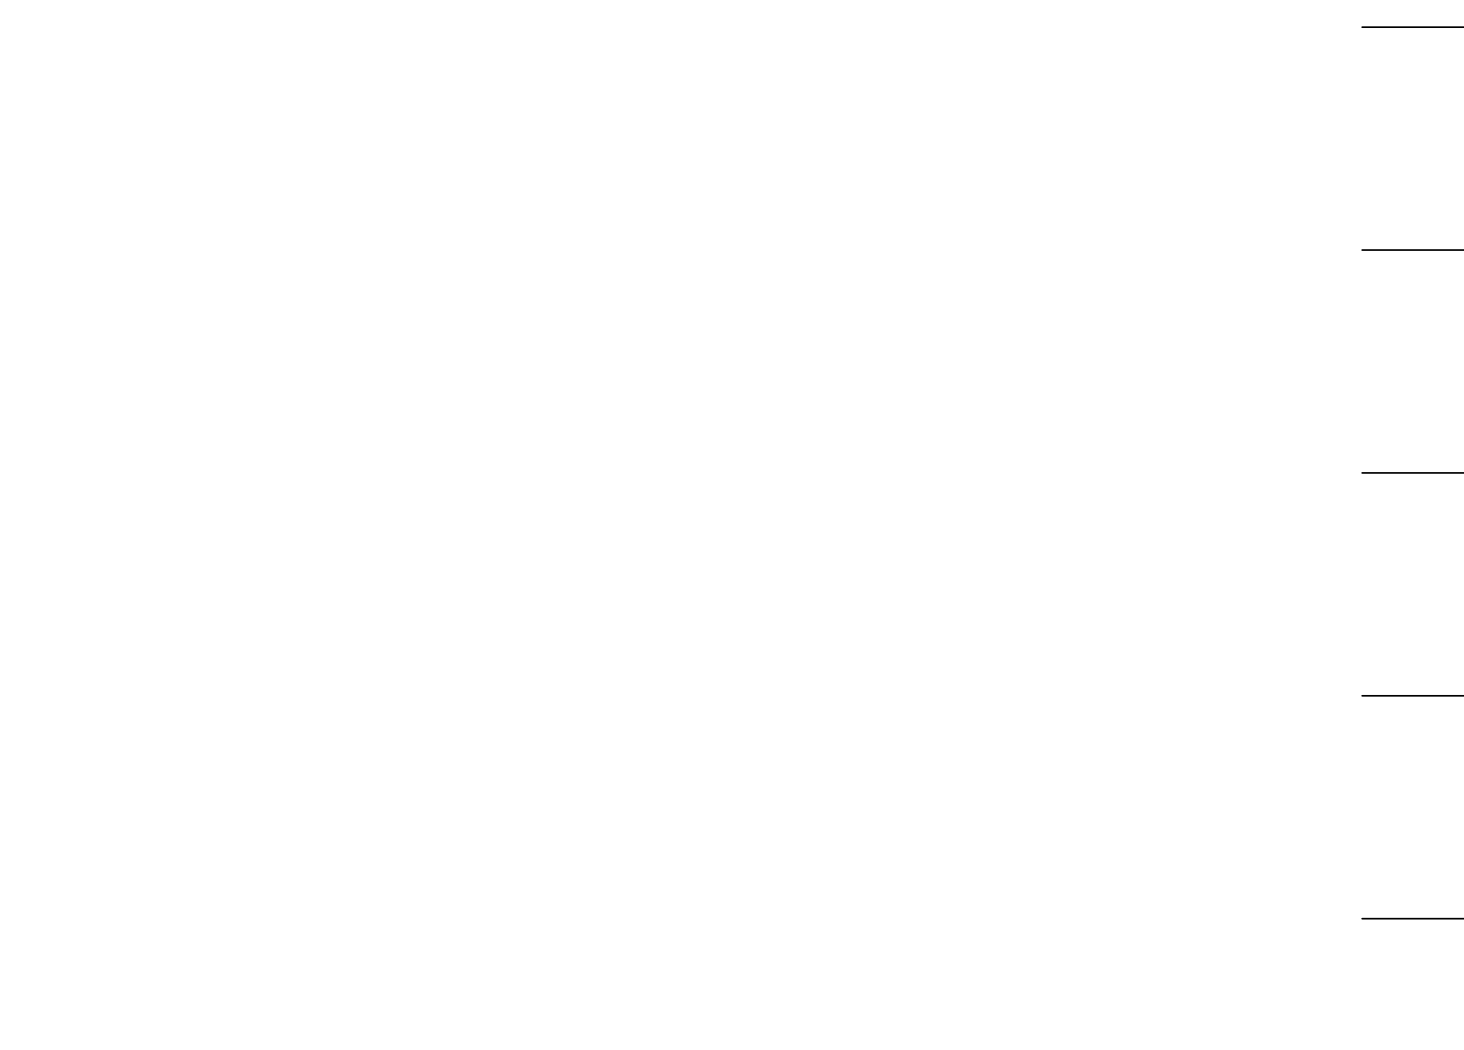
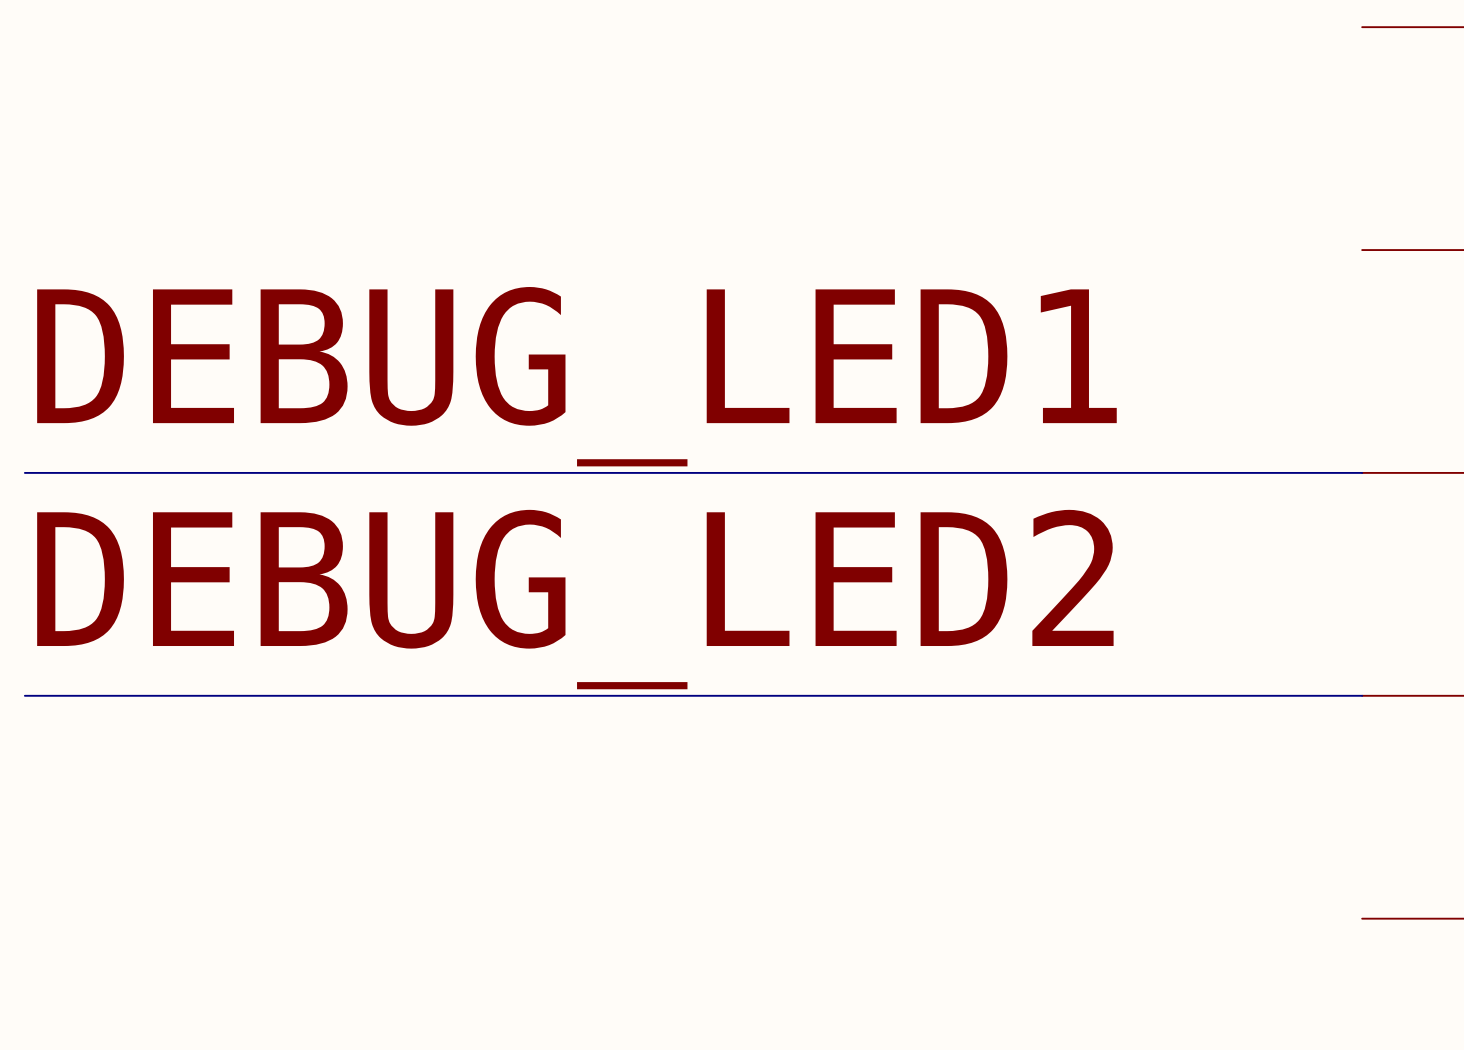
label: none -> DEBUG_LED1 (576, 376)
wire: none -> (24, 472) (1362, 472)
label: none -> DEBUG_LED2 (575, 599)
wire: none -> (24, 695) (1362, 695)

